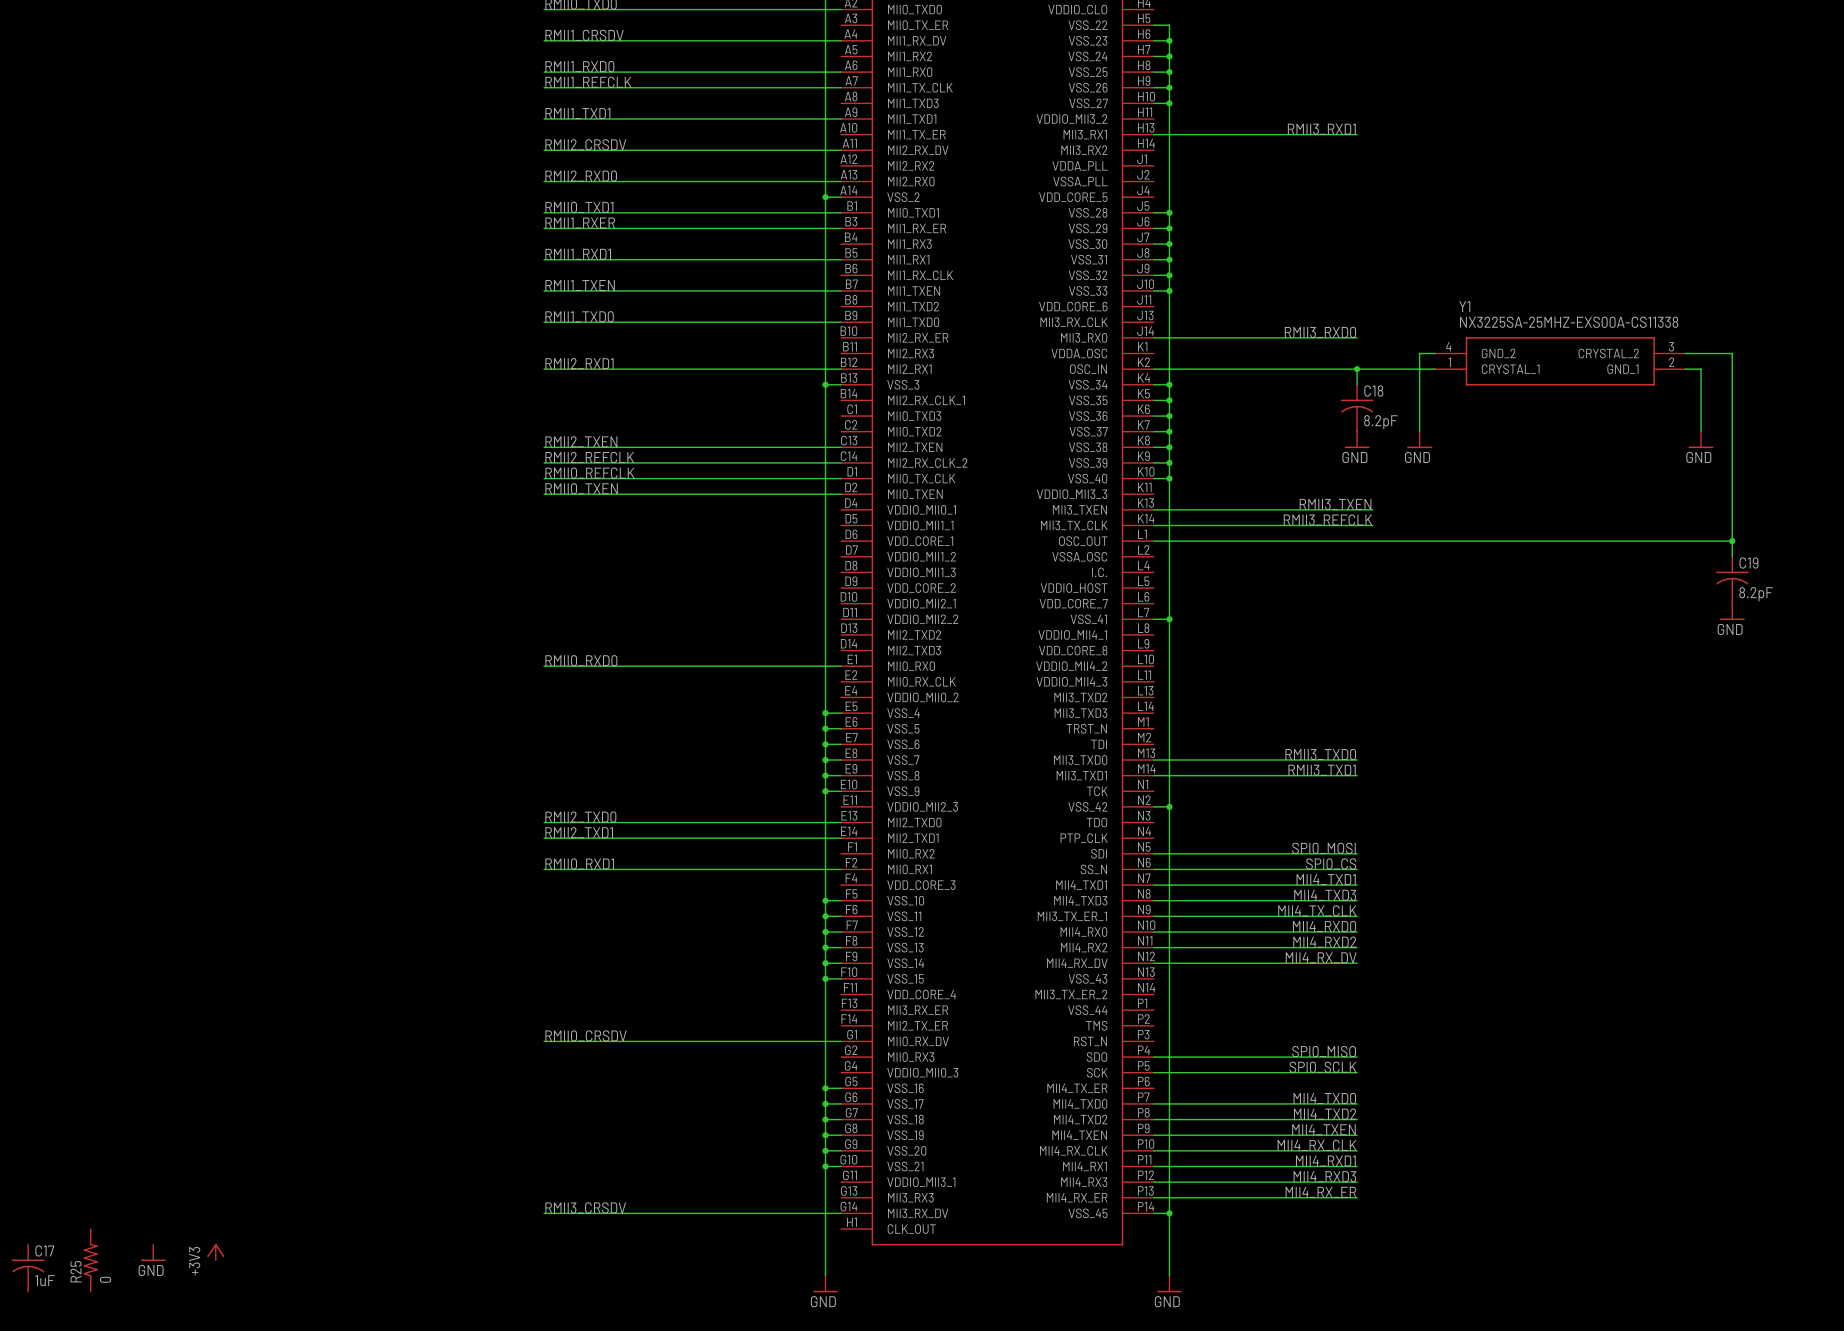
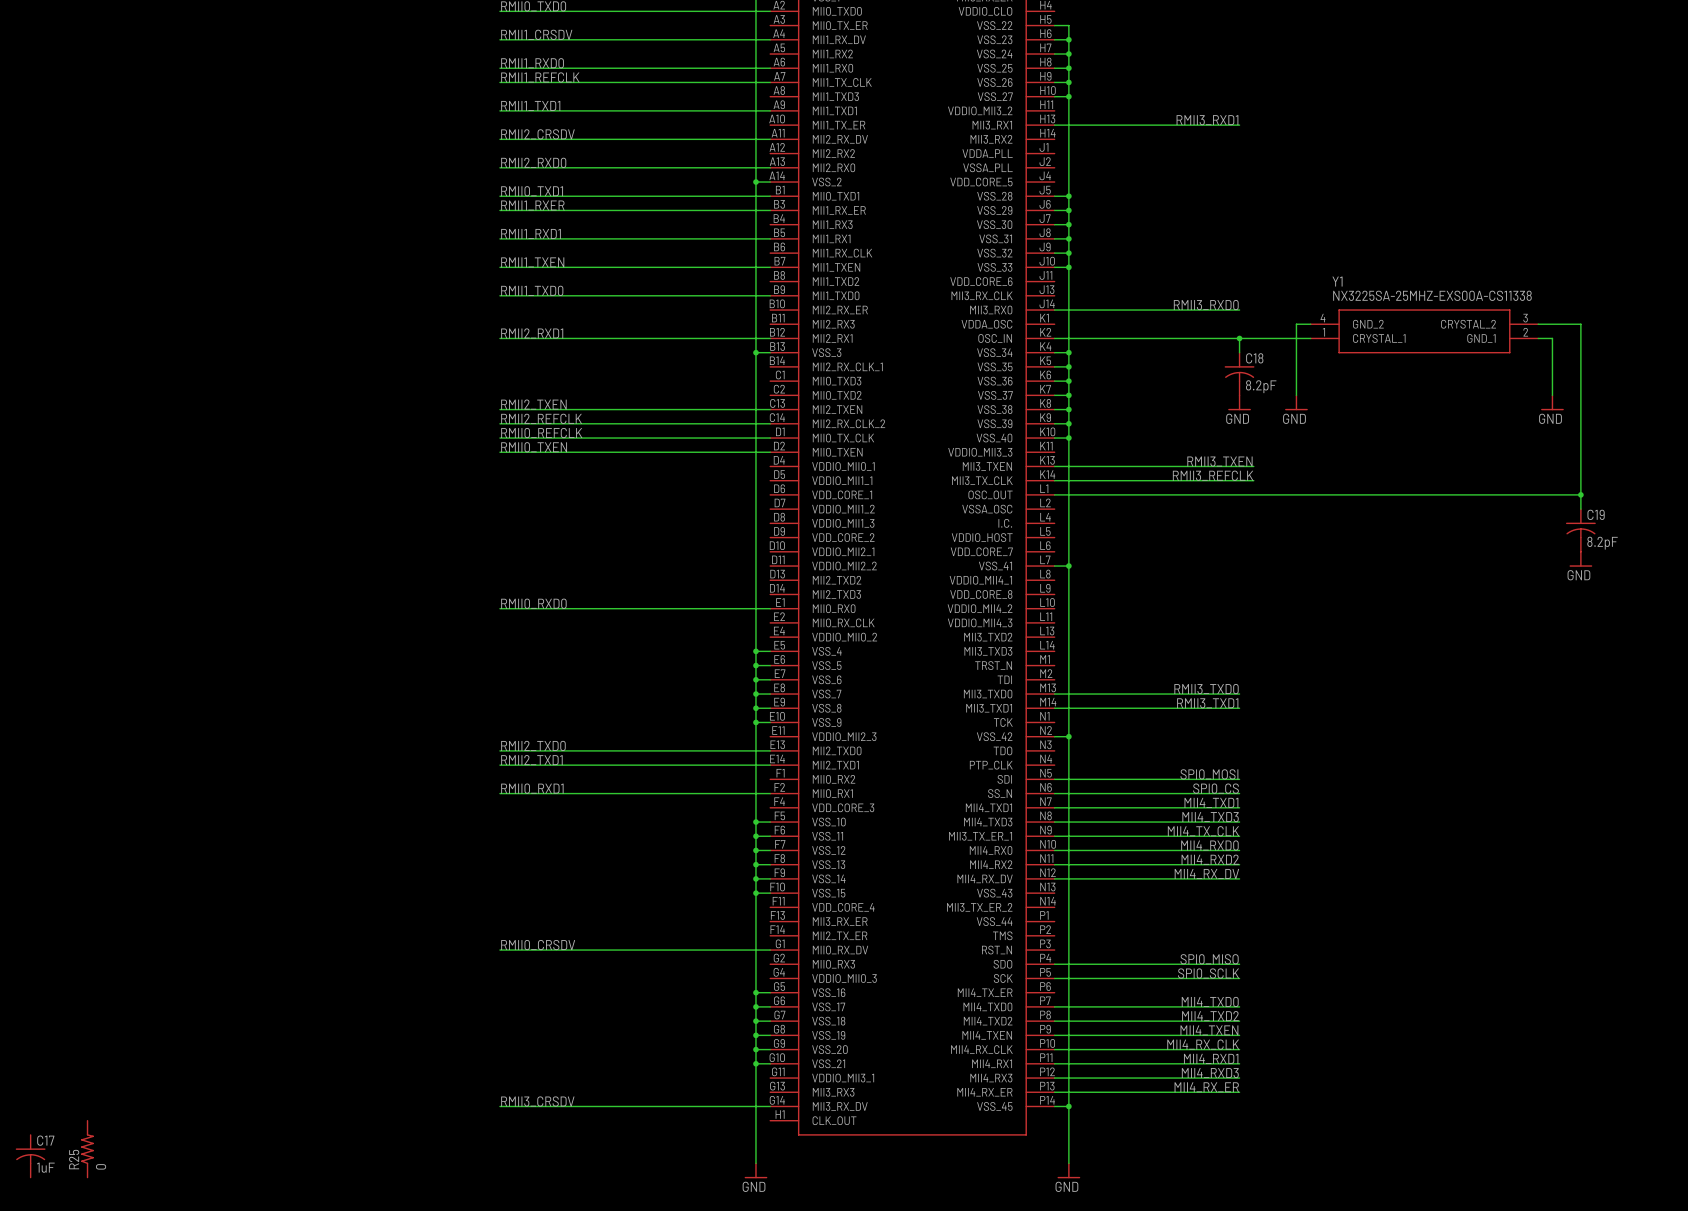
power symbol: GND (153, 1252) -> none
power symbol: +3V3 (215, 1252) -> none

